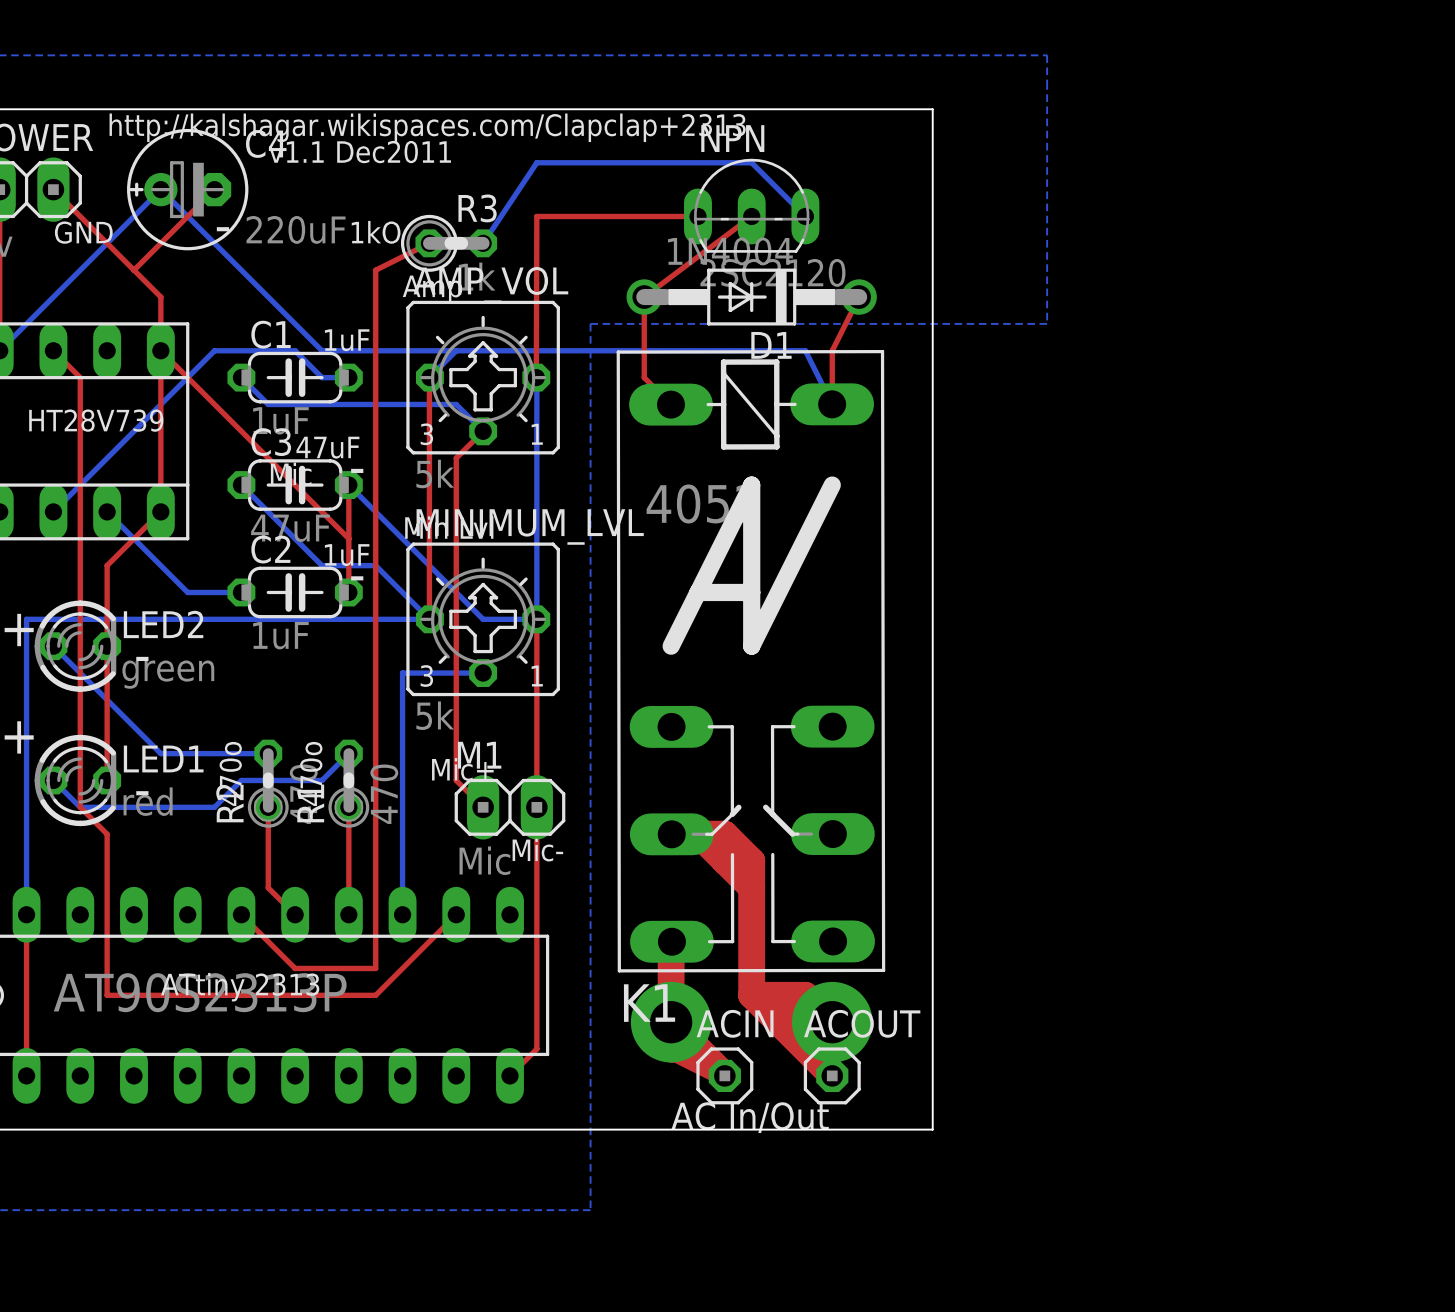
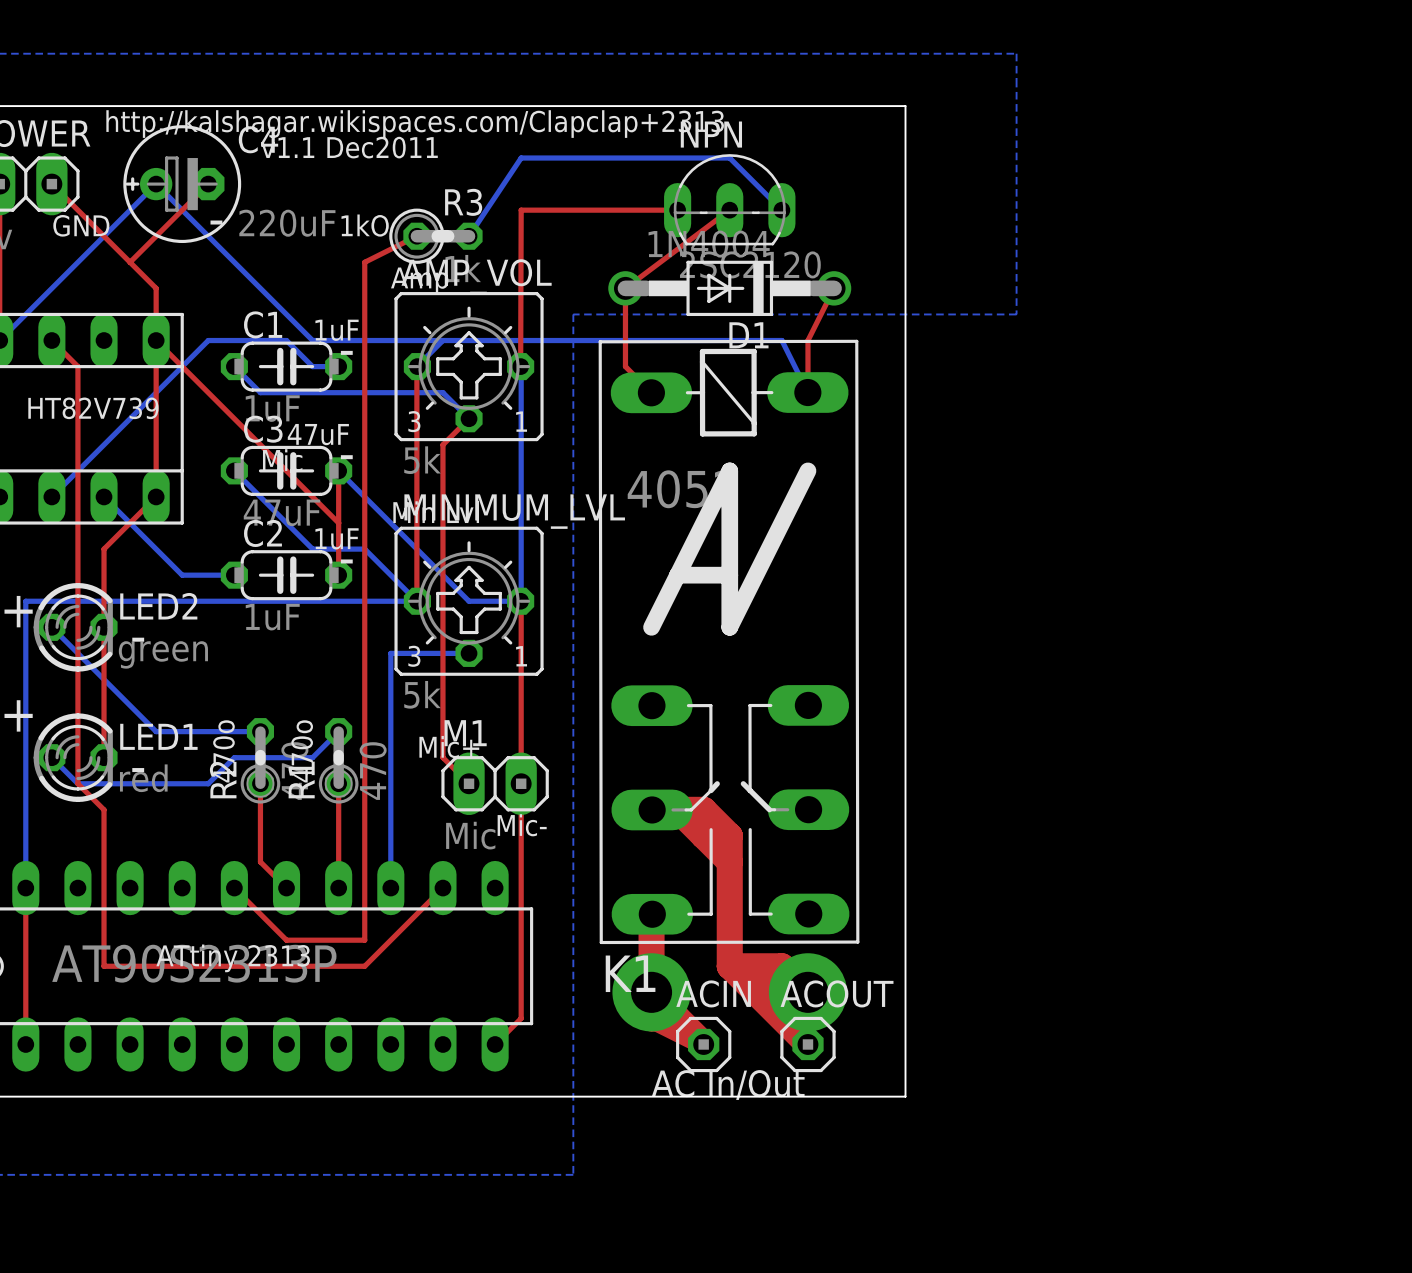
text: none -> - (346, 352)
text: HT28V739 (96, 420) -> HT82V739 (93, 408)

